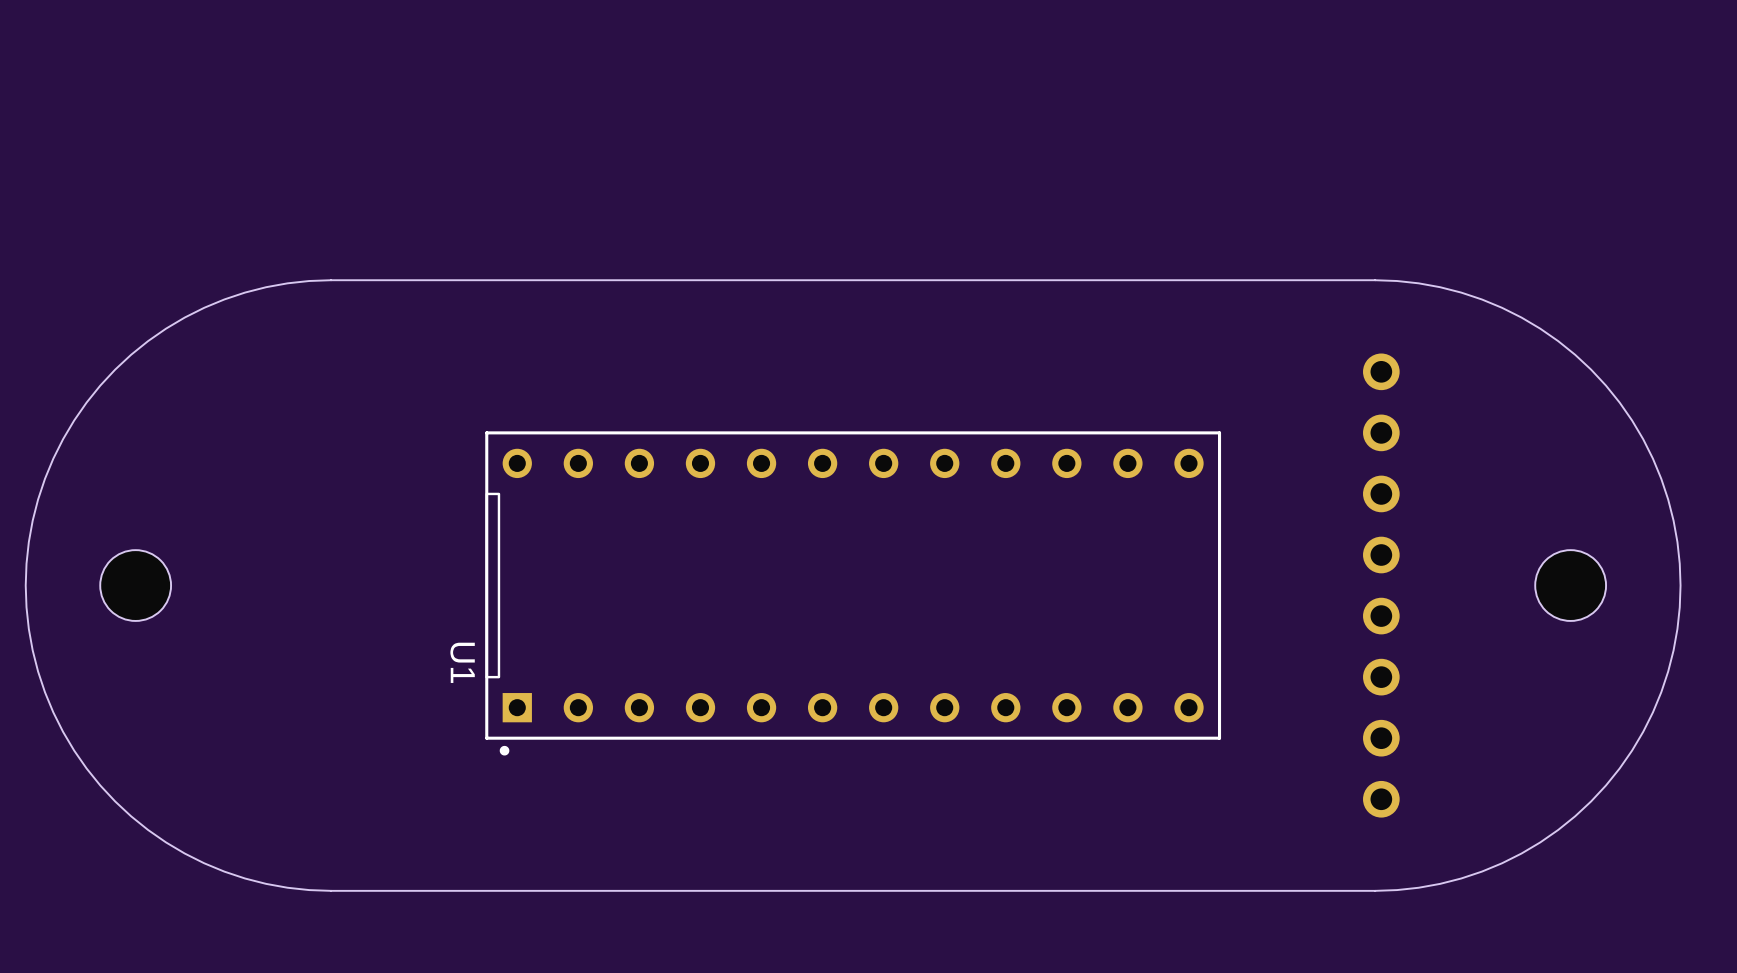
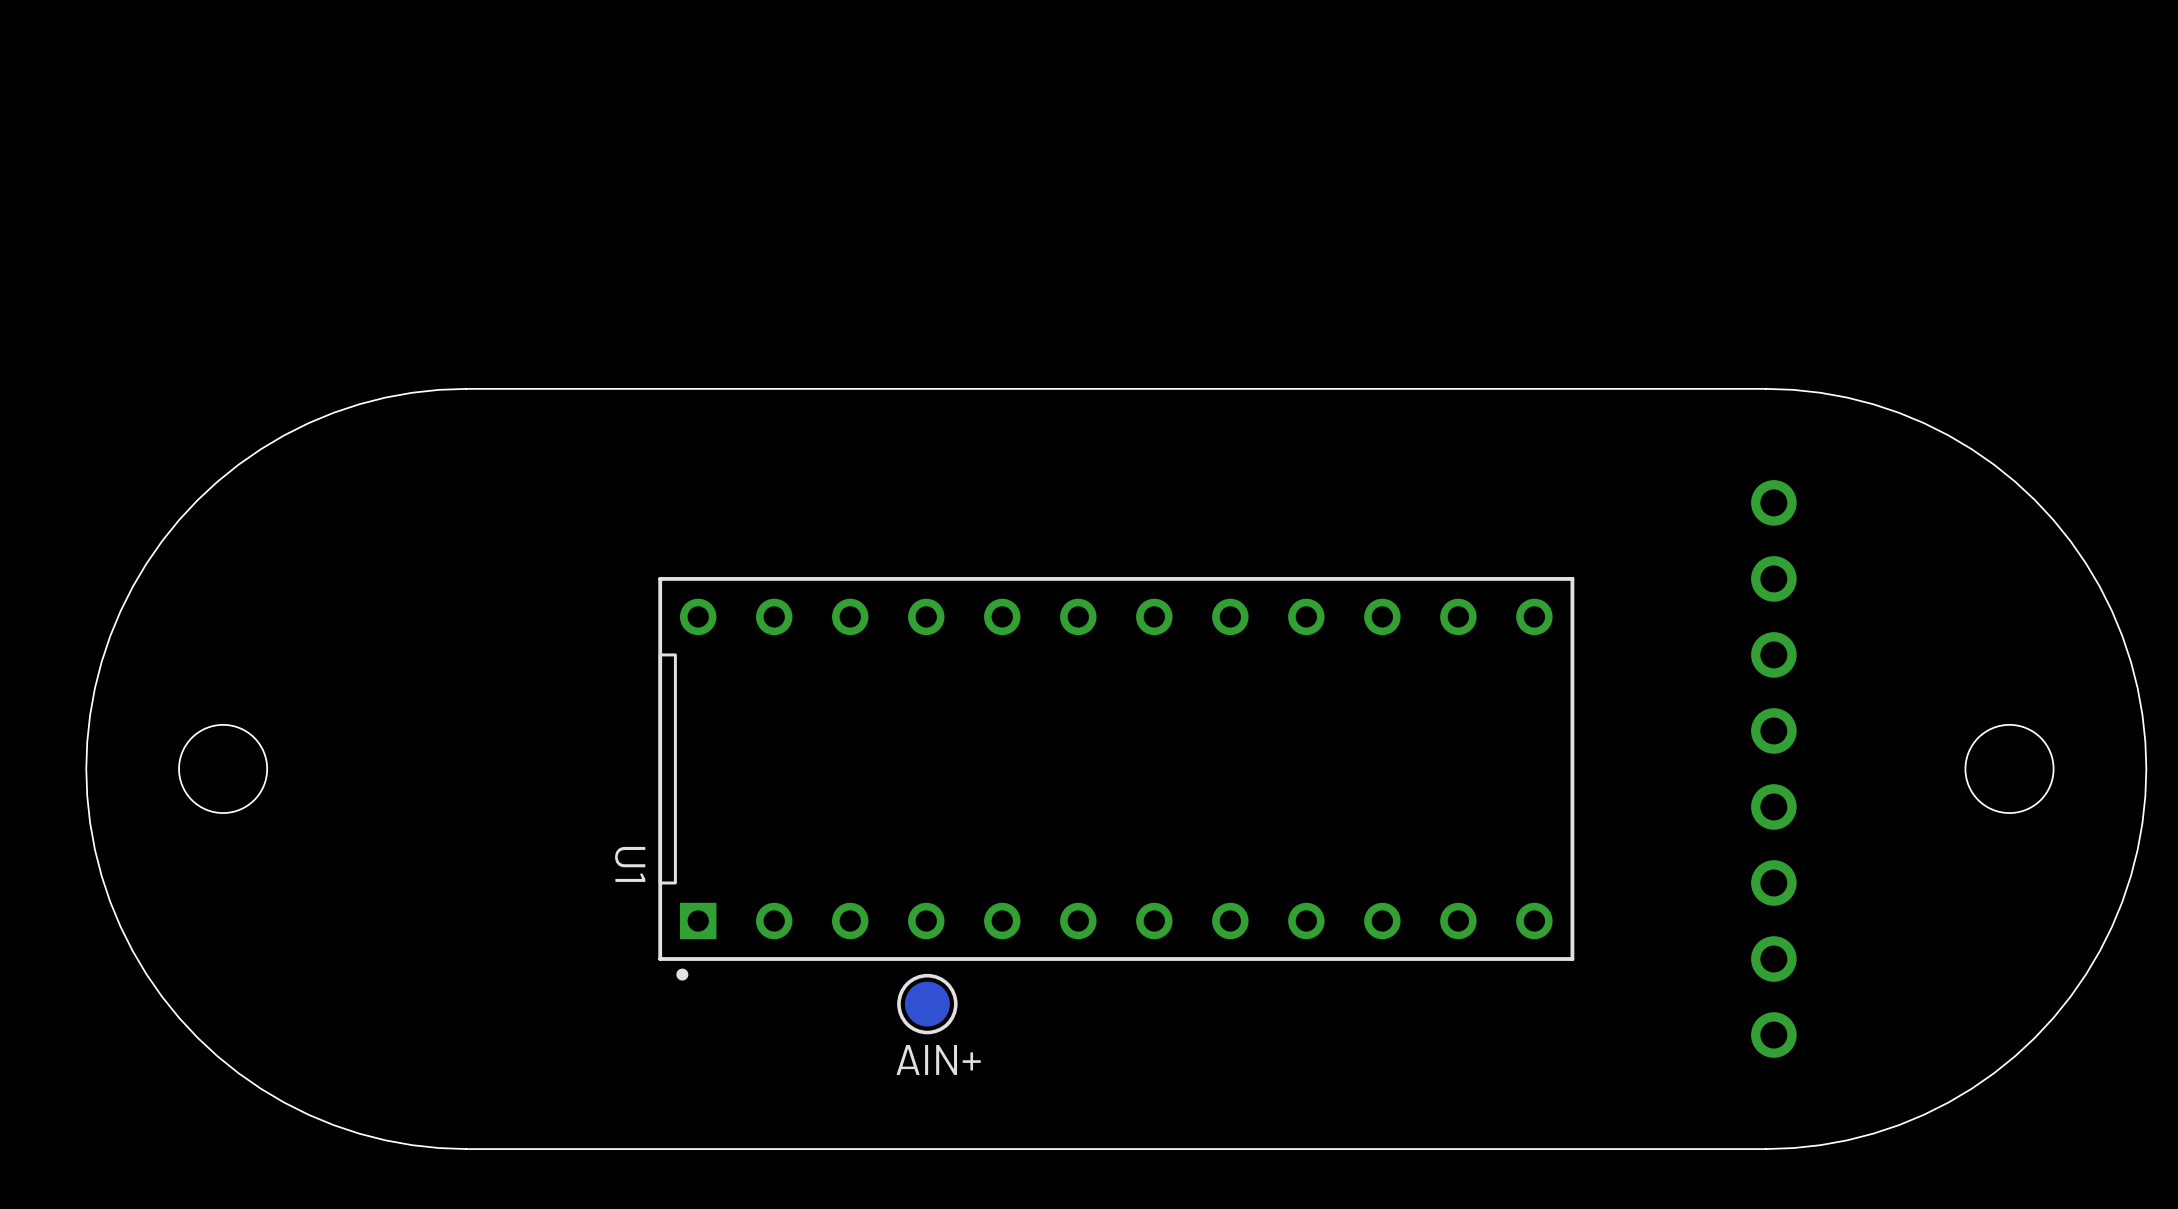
AIN+: none -> (927, 1004)

